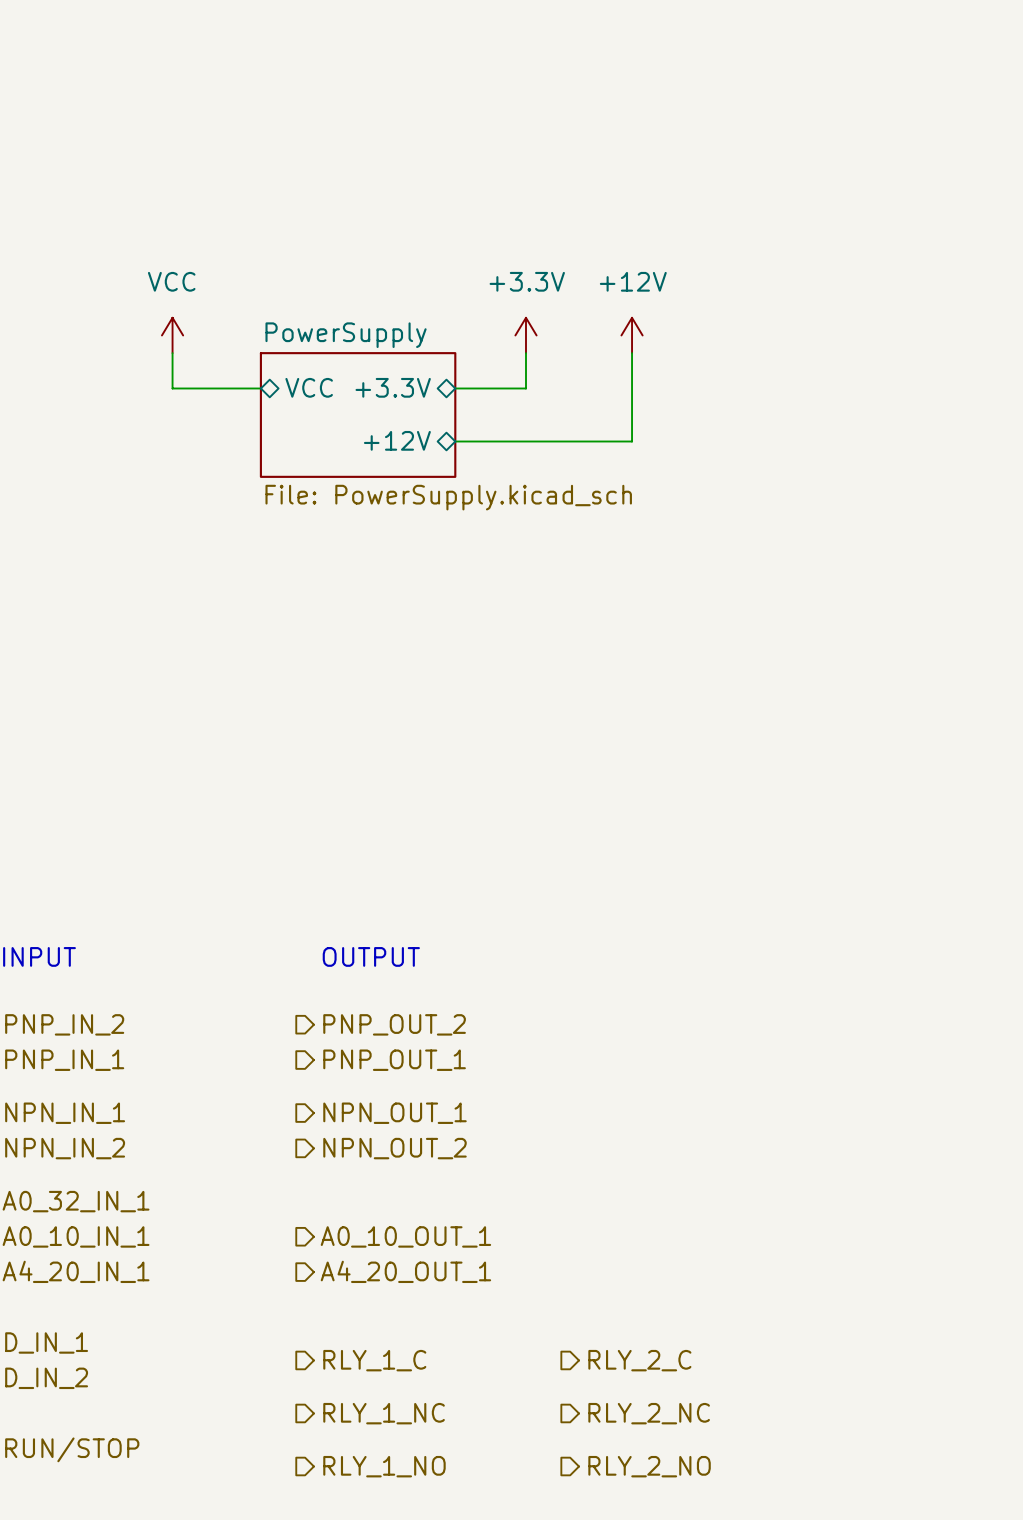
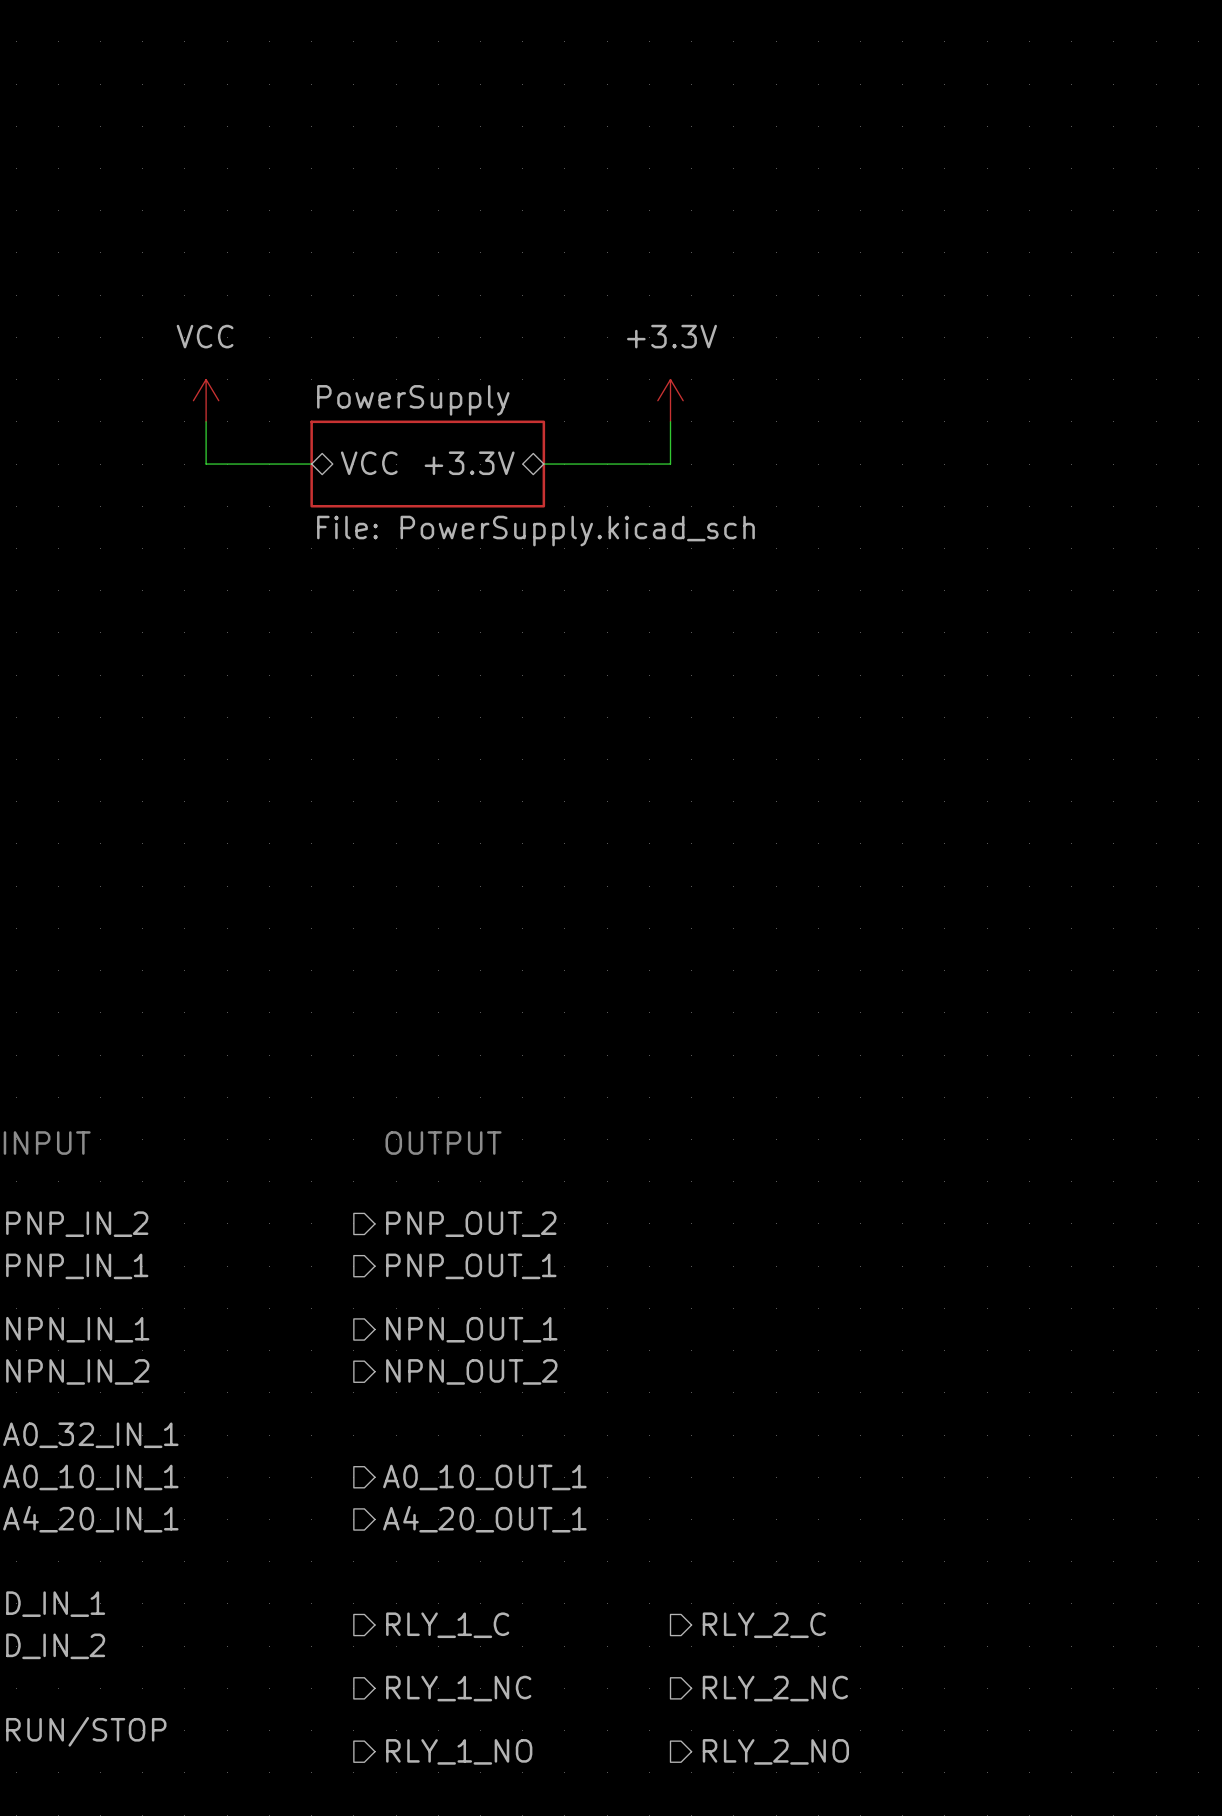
power symbol position: +3.3V (525, 335) -> +3.3V (670, 400)
power symbol: +12V (632, 335) -> none
wire: (525, 353) (525, 388) -> (670, 421) (670, 464) (628, 464)
wire: (632, 353) (632, 441) (455, 441) -> none
sheet PowerSupply: none -> File: PowerSupply.kicad_sch (427, 464)
sheet PowerSupply: File: PowerSupply.kicad_sch (358, 414) -> none
sheet pin: +12V (397, 440) -> none

